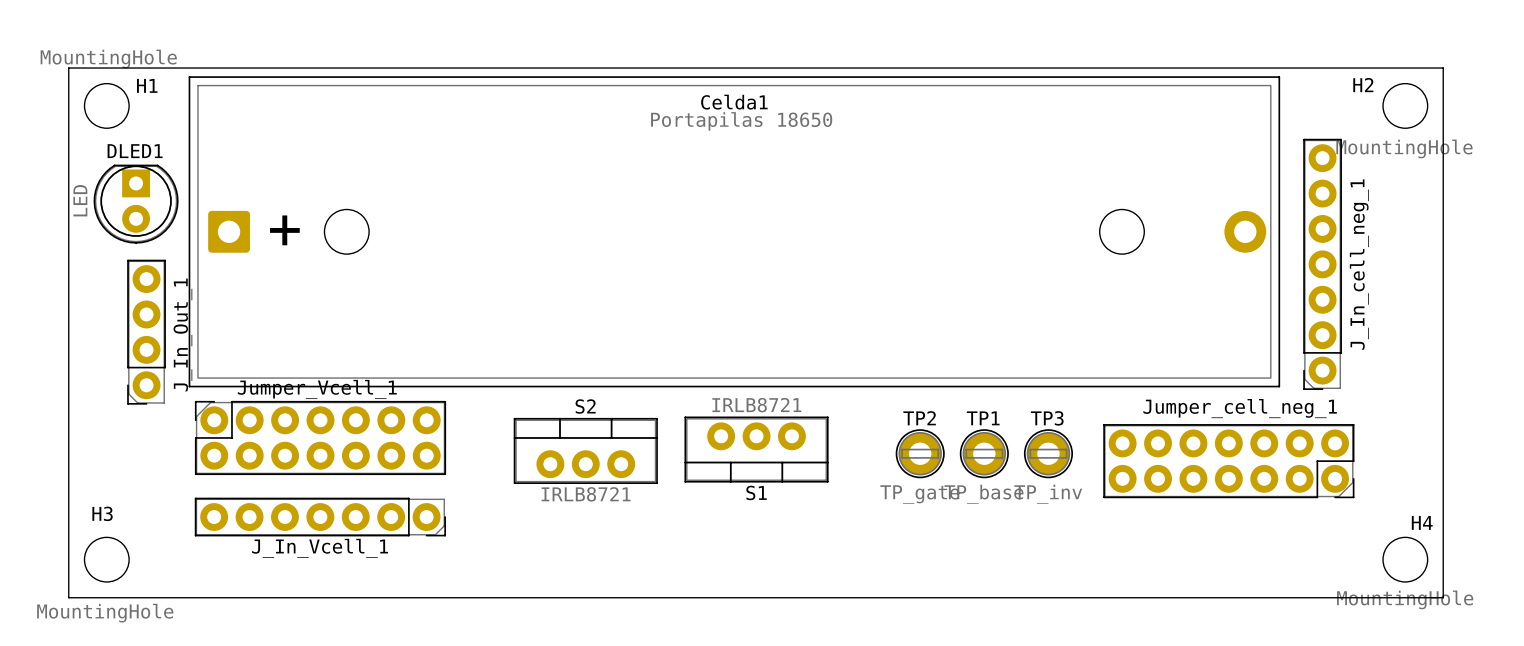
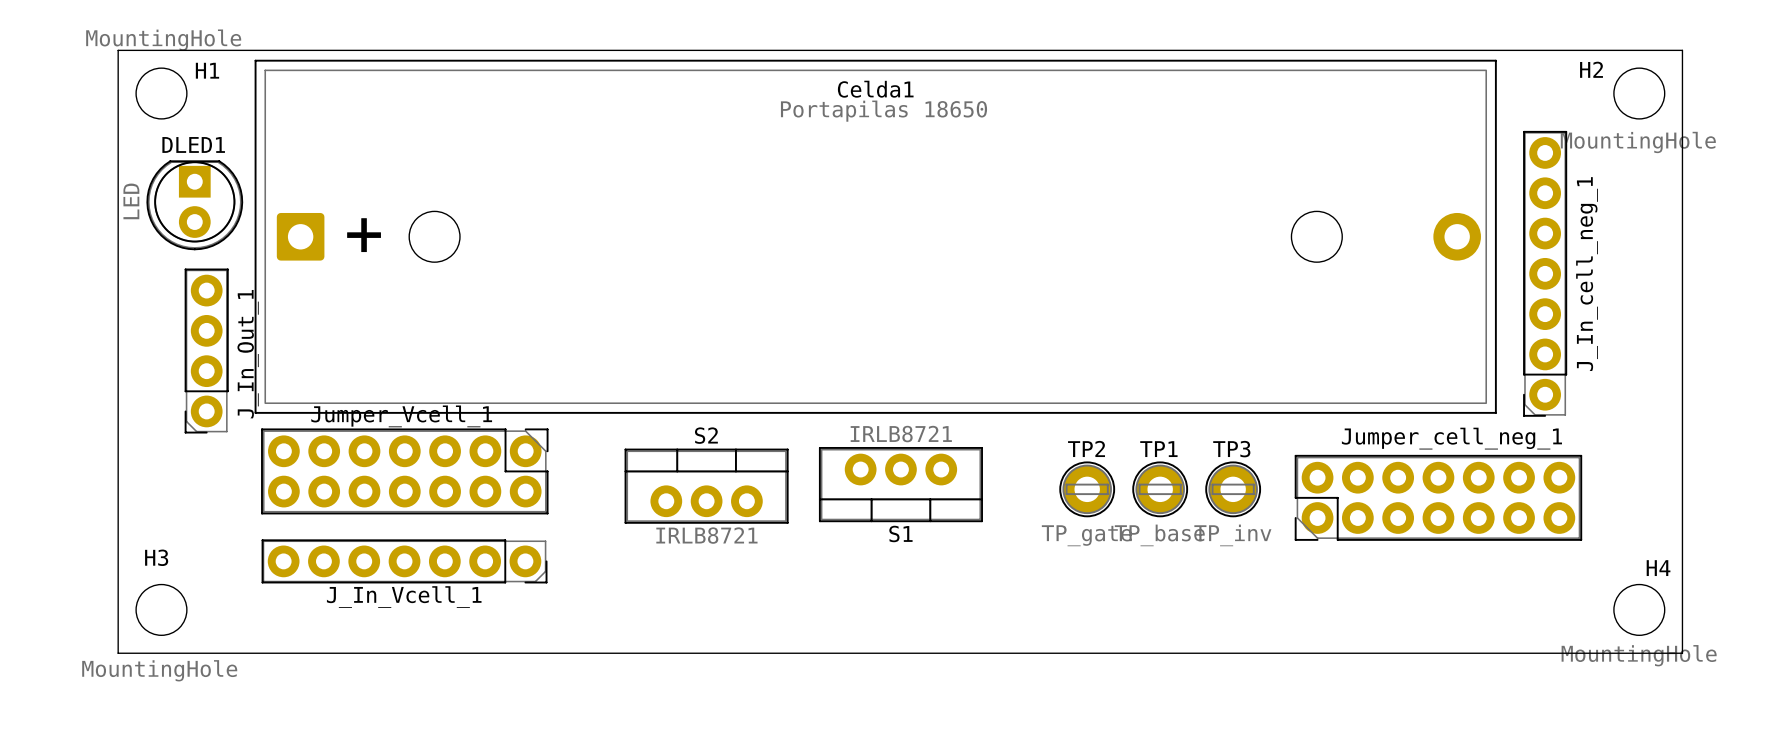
Jumper_Vcell_1 footprint: [194, 400, 447, 476] -> [261, 428, 549, 515]
Jumper_cell_neg_1 footprint: [1103, 424, 1355, 499] -> [1294, 454, 1583, 541]

